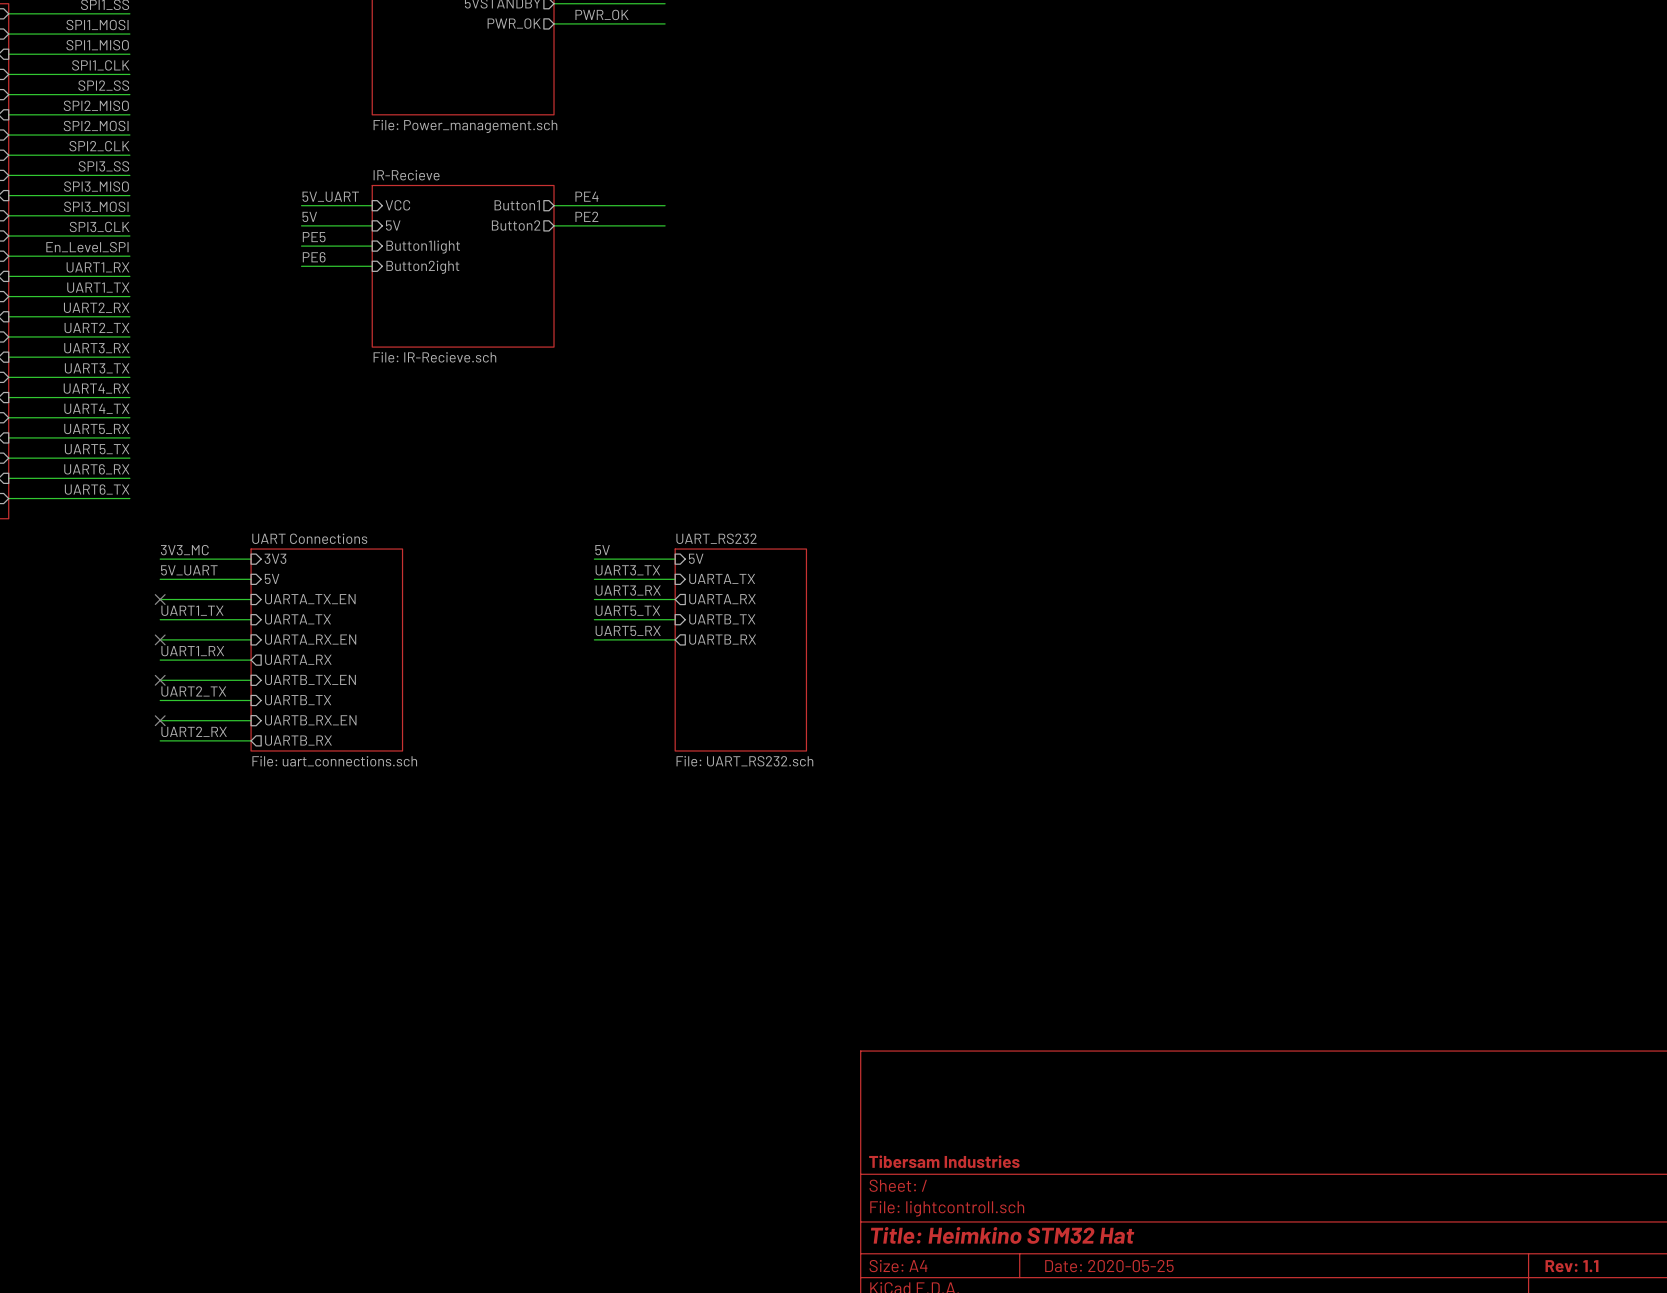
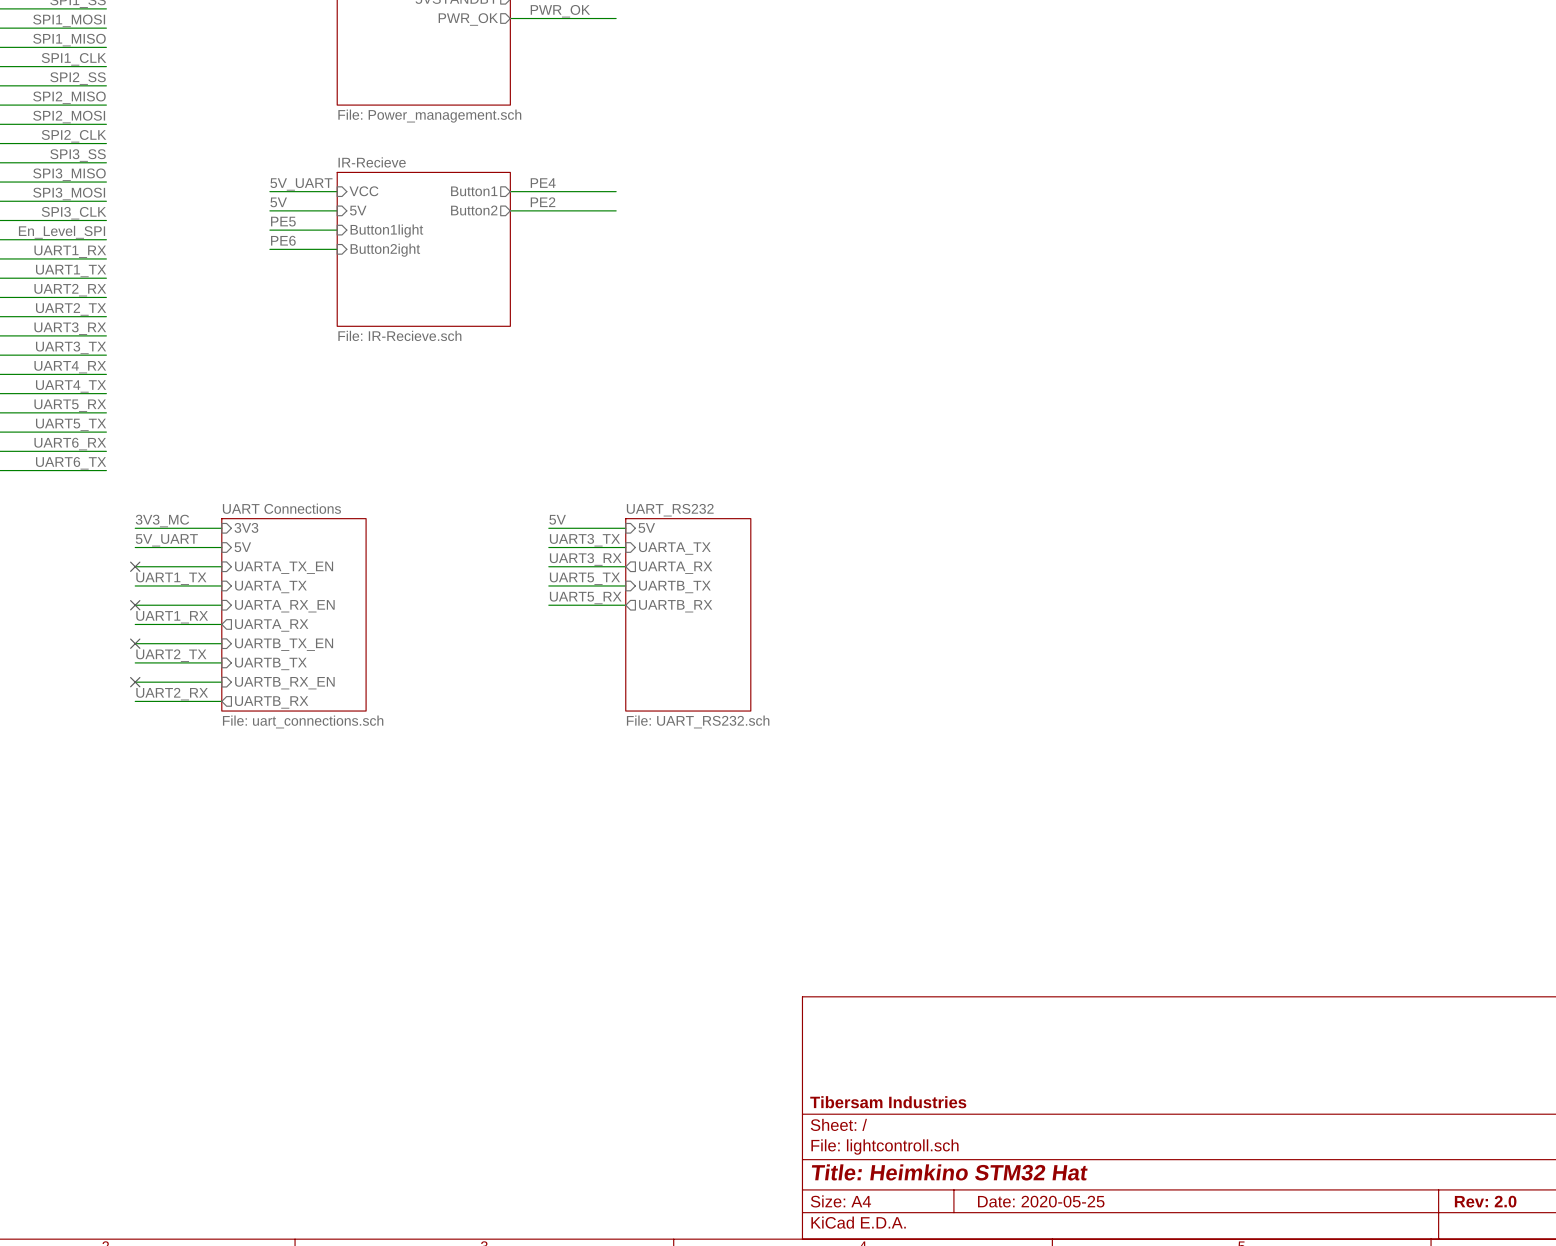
title block: Rev: 1.1 (1571, 1266) -> Rev: 2.0 (1485, 1201)

